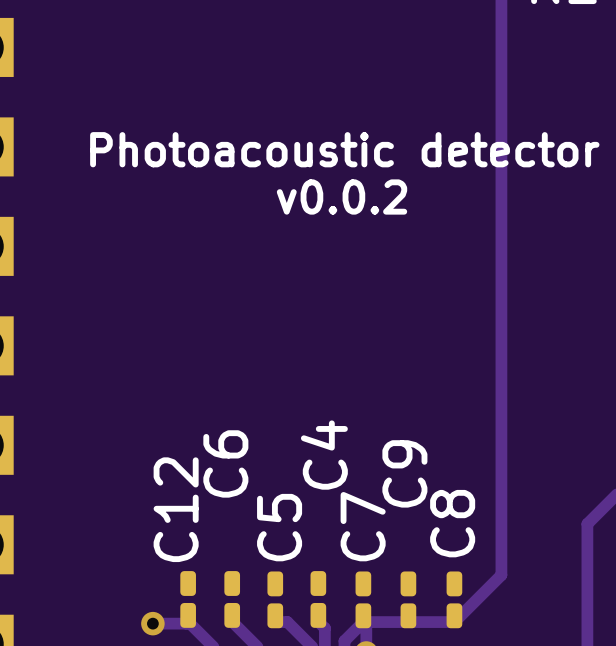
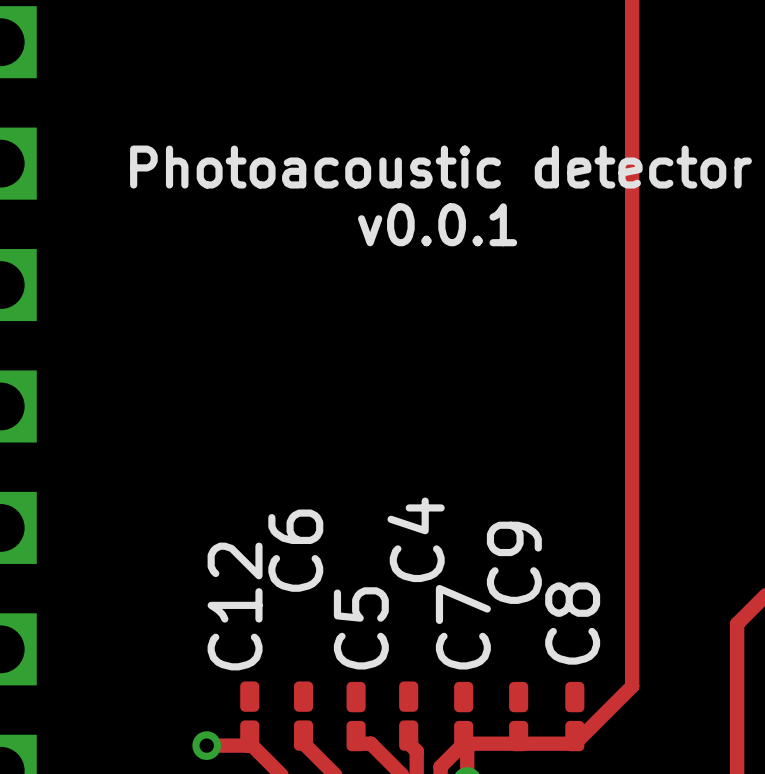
text: v0.0.2 (342, 197) -> v0.0.1 (437, 224)

